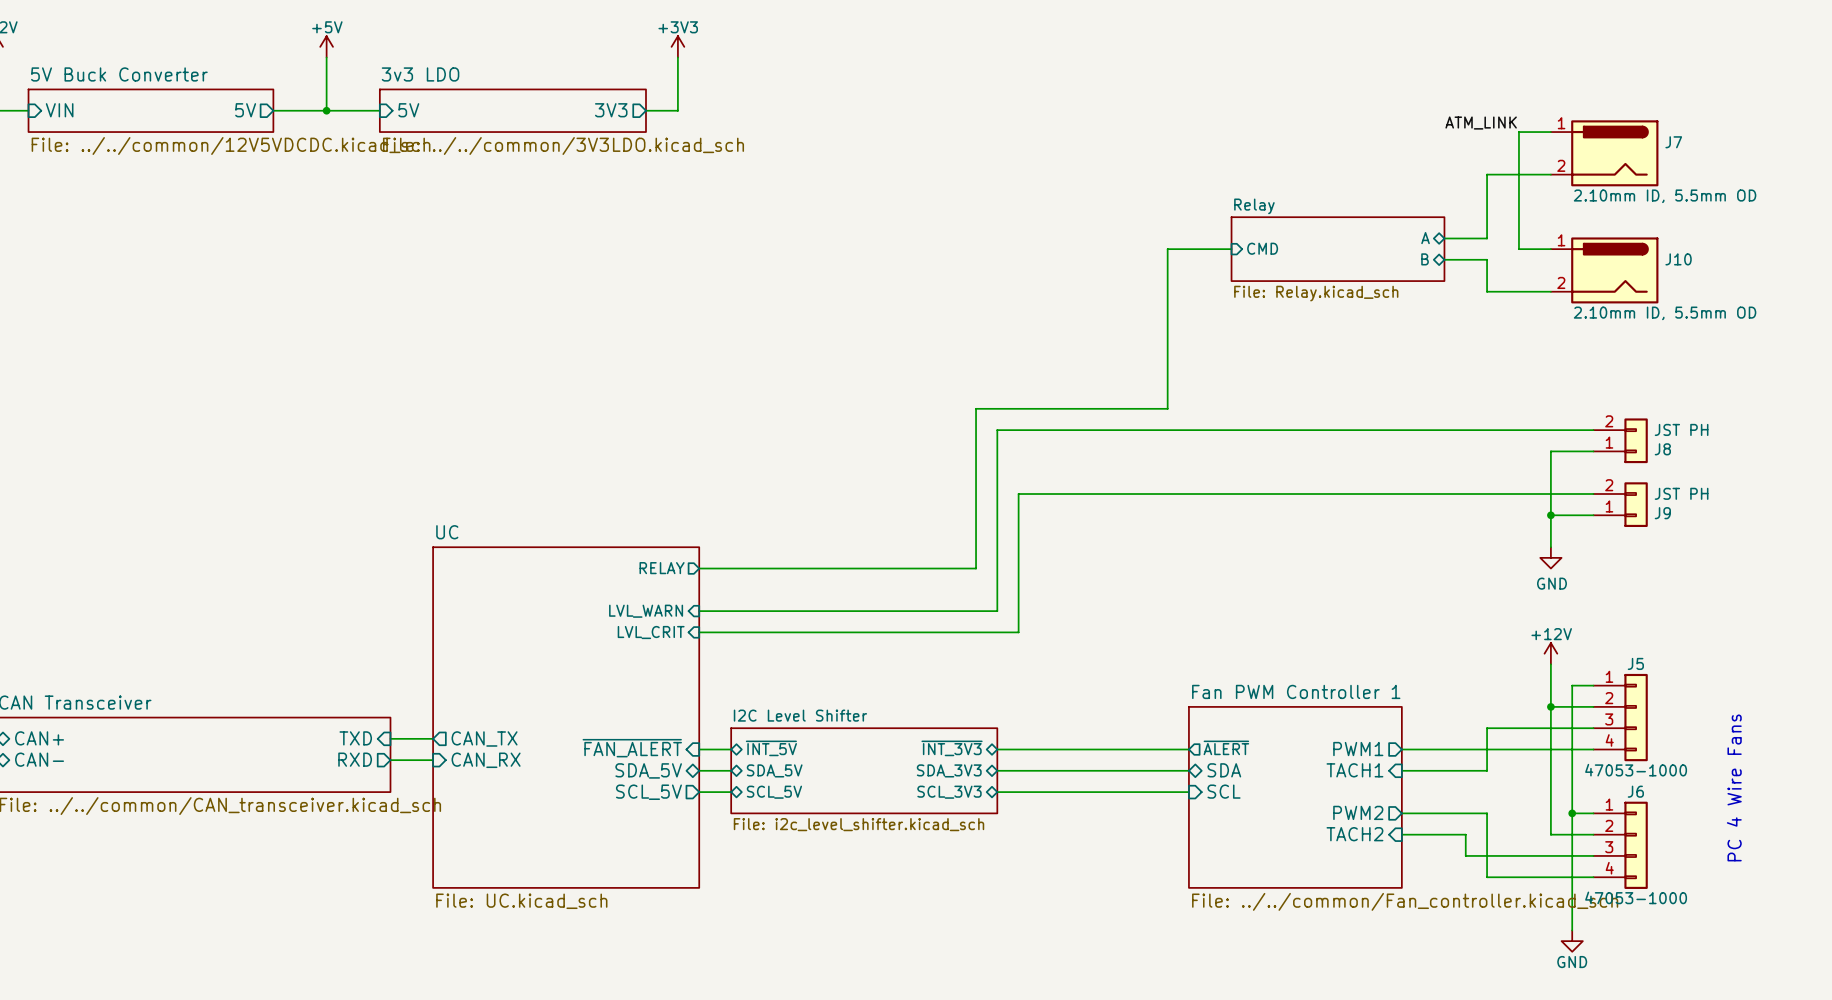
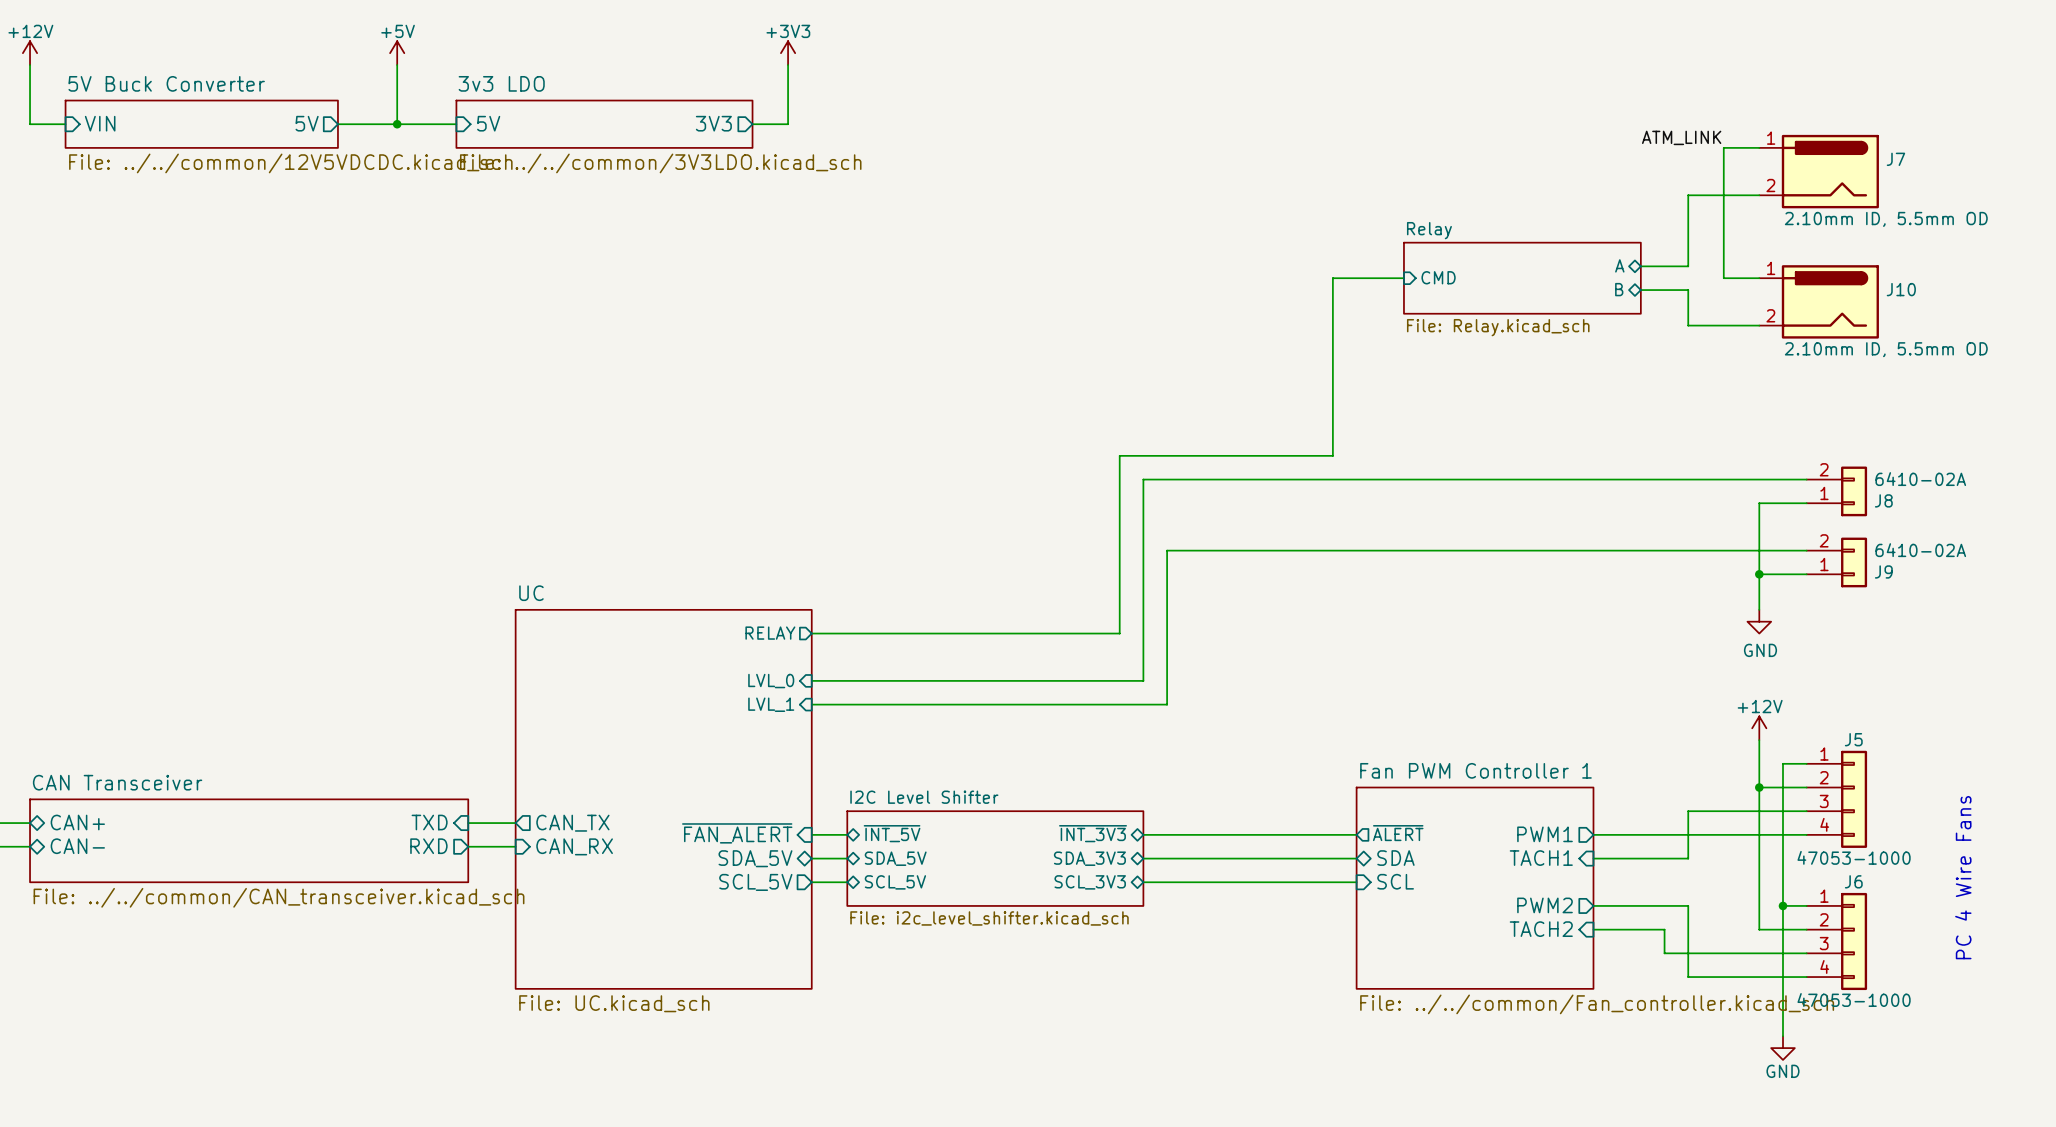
J8 value: JST PH (1681, 429) -> 6410-02A (1920, 479)
J9 value: JST PH (1681, 493) -> 6410-02A (1920, 550)
sheet pin: LVL_WARN (646, 611) -> LVL_0 (771, 681)
sheet pin: LVL_CRIT (651, 632) -> LVL_1 (771, 704)

